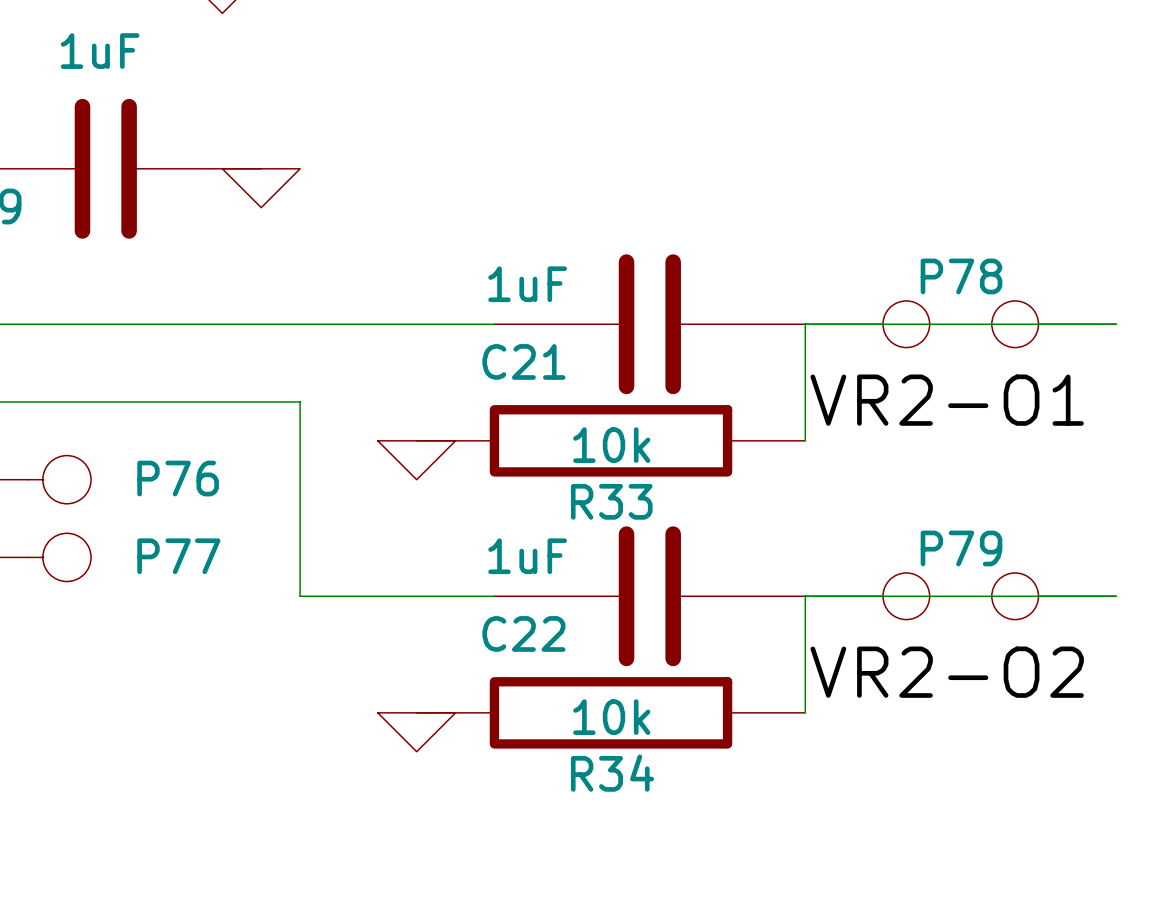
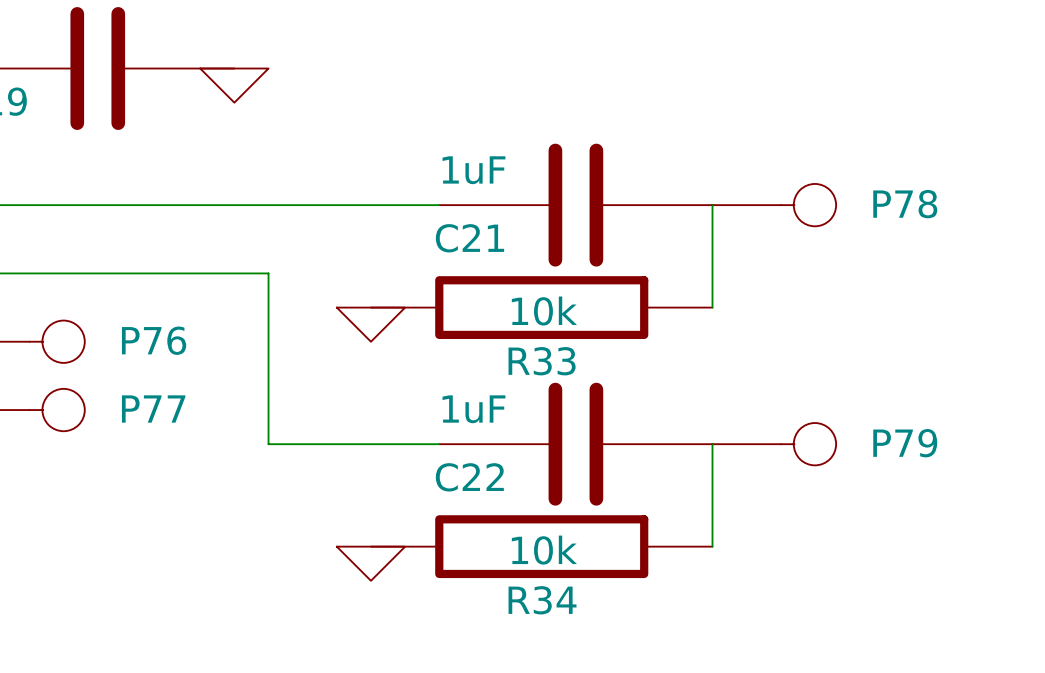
P78 name position: P78 (961, 276) -> P78 (905, 204)
P78 symbol: [805, 300, 1117, 348] -> [712, 183, 837, 227]
wire: (805, 324) (1116, 324) -> none
label: VR2-O1 (947, 400) -> none
P79 name position: P79 (961, 548) -> P79 (905, 443)
P79 symbol: [805, 572, 1117, 620] -> [712, 423, 837, 466]
wire: (805, 596) (1116, 596) -> none
label: VR2-O2 (947, 672) -> none

